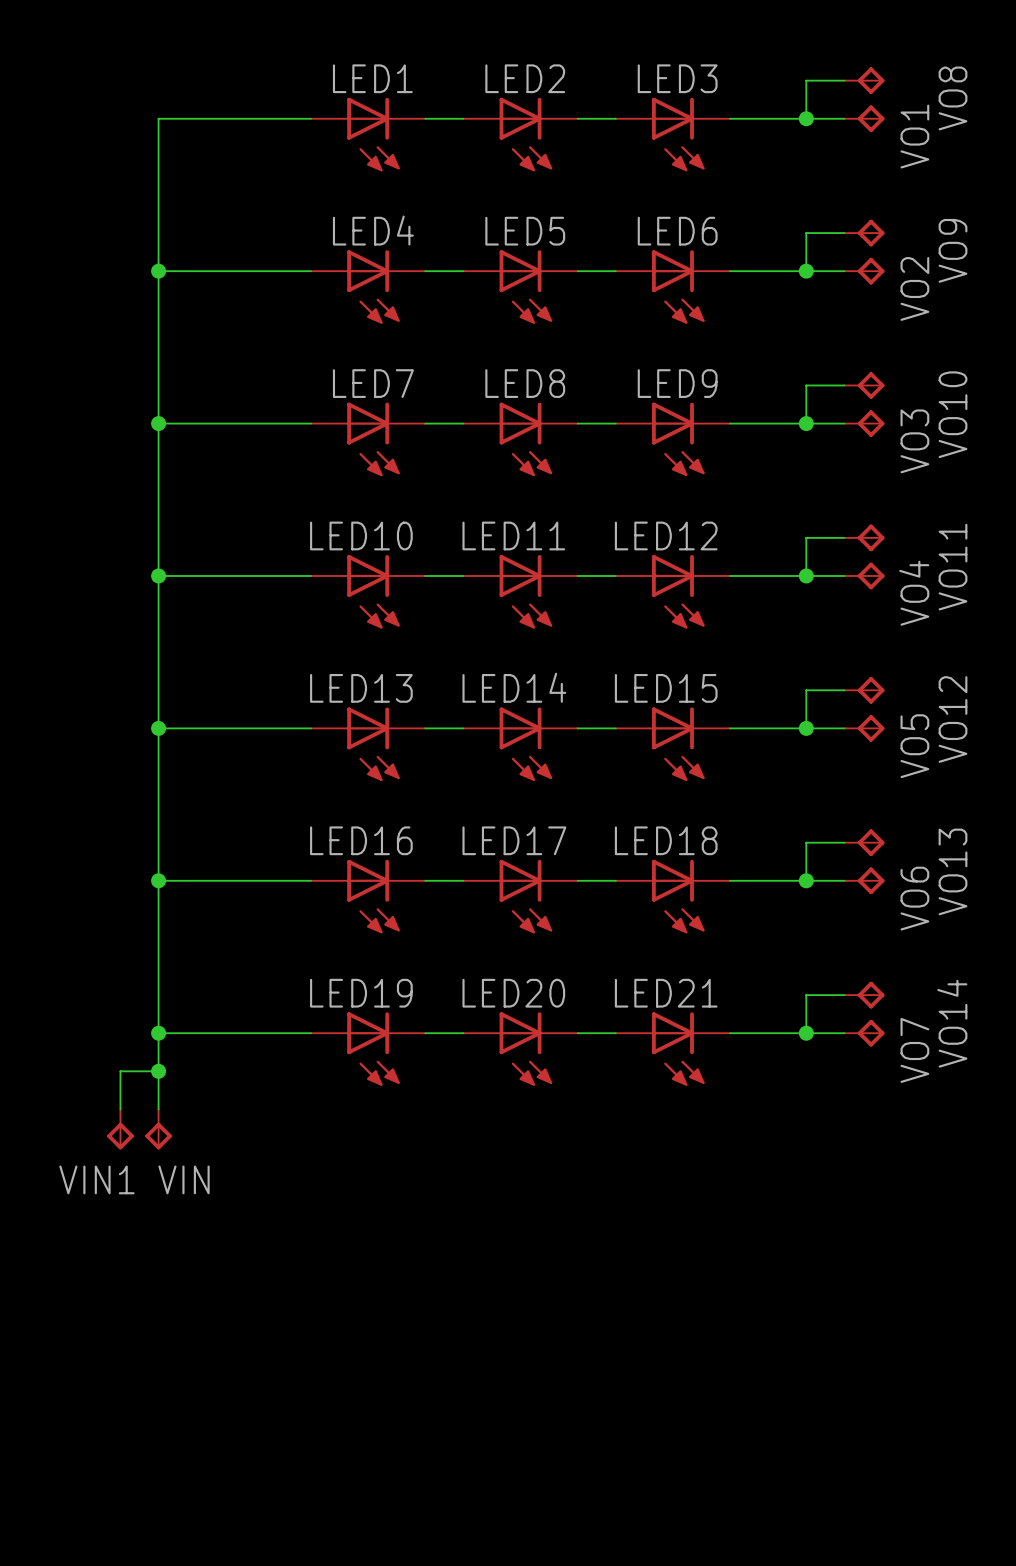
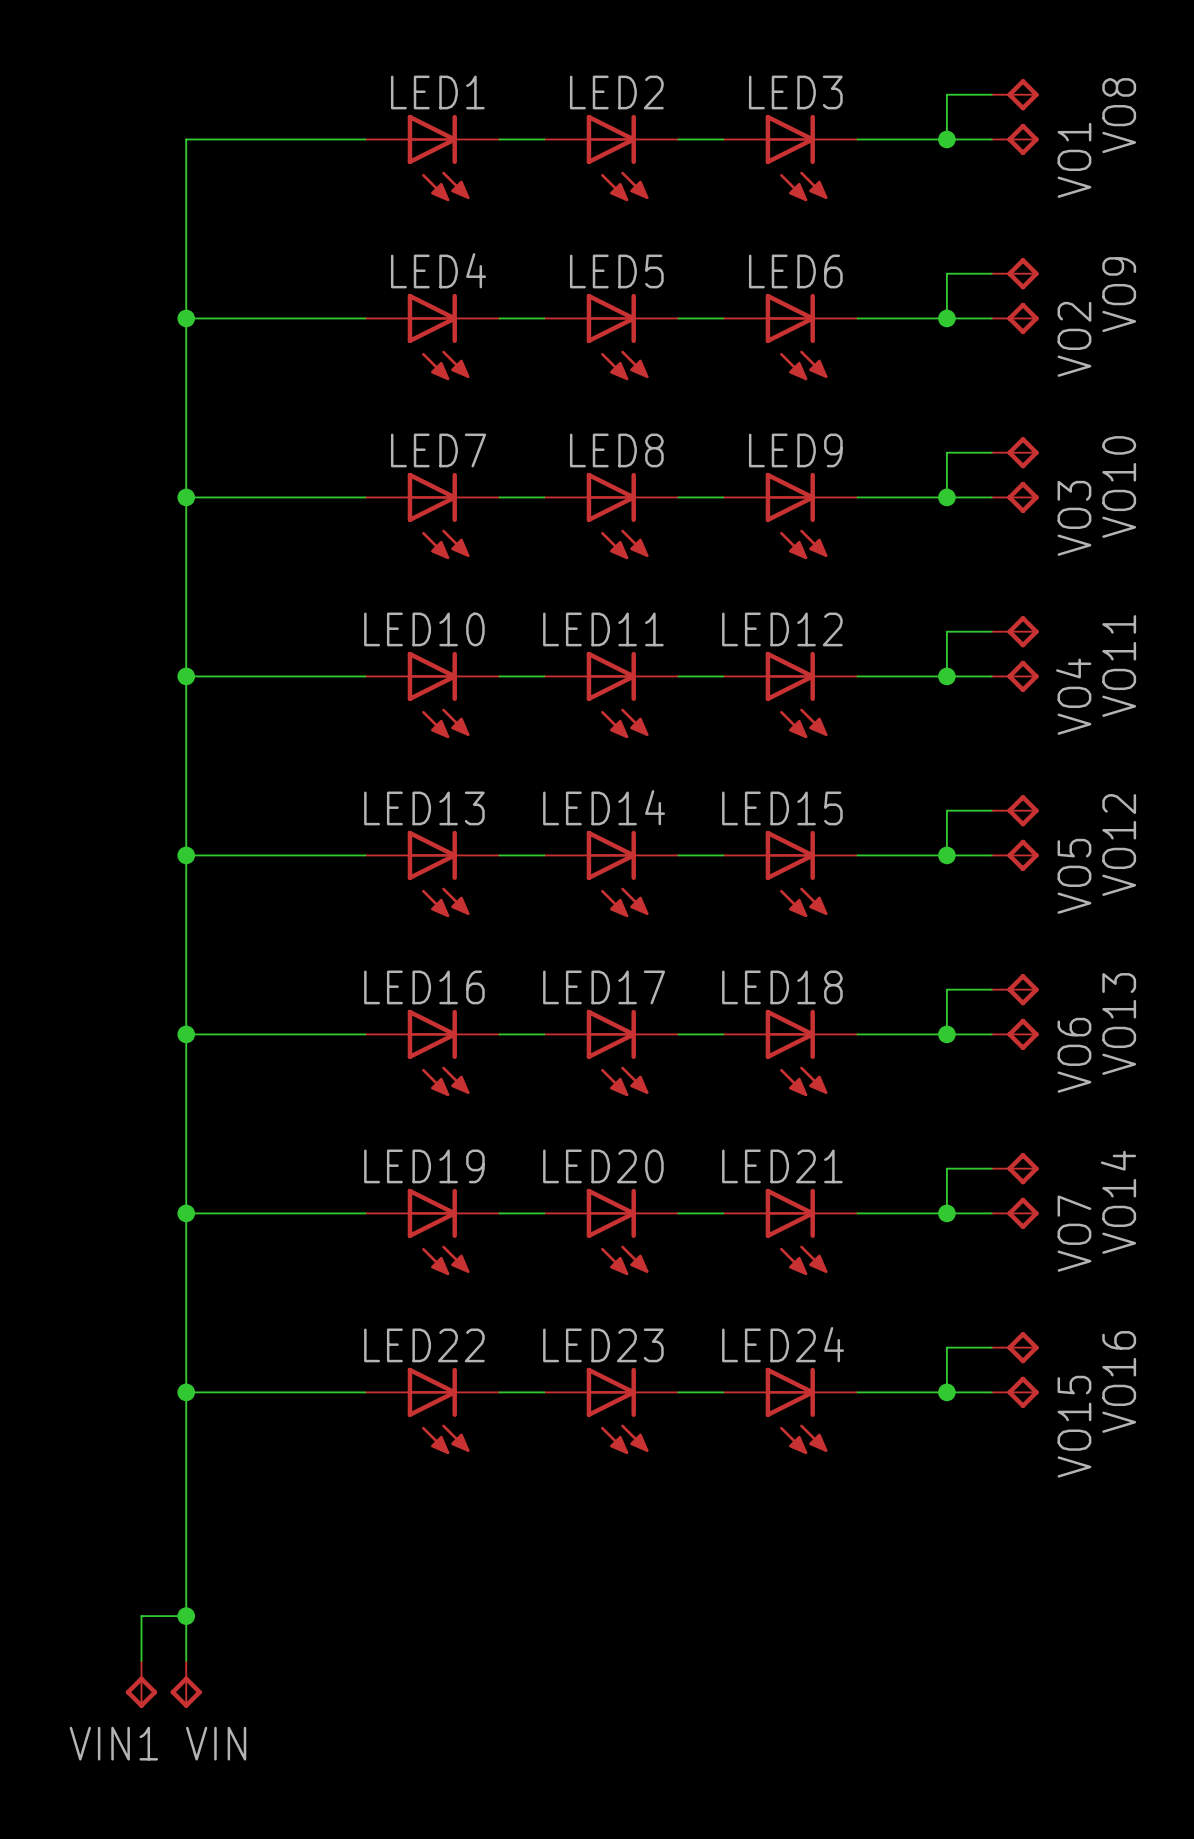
wire: (158, 1071) (120, 1071) (120, 1109) -> (186, 1616) (141, 1616) (141, 1660)
junction: (158, 1071) -> none
wire: none -> (186, 1302) (186, 1660)
VIN1 position: (120, 1129) -> (141, 1684)
VIN position: (158, 1129) -> (186, 1684)
wire: none -> (991, 1347) (946, 1347) (946, 1392)
VO16: none -> (1015, 1347)
wire: none -> (186, 1392) (365, 1392)
junction: none -> (186, 1392)
wire: none -> (499, 1392) (544, 1392)
wire: none -> (678, 1392) (723, 1392)
wire: none -> (857, 1392) (991, 1392)
junction: none -> (946, 1392)
VO15: none -> (1015, 1392)
LED22: none -> (432, 1410)
LED23: none -> (611, 1410)
LED24: none -> (790, 1410)
junction: none -> (186, 1616)

